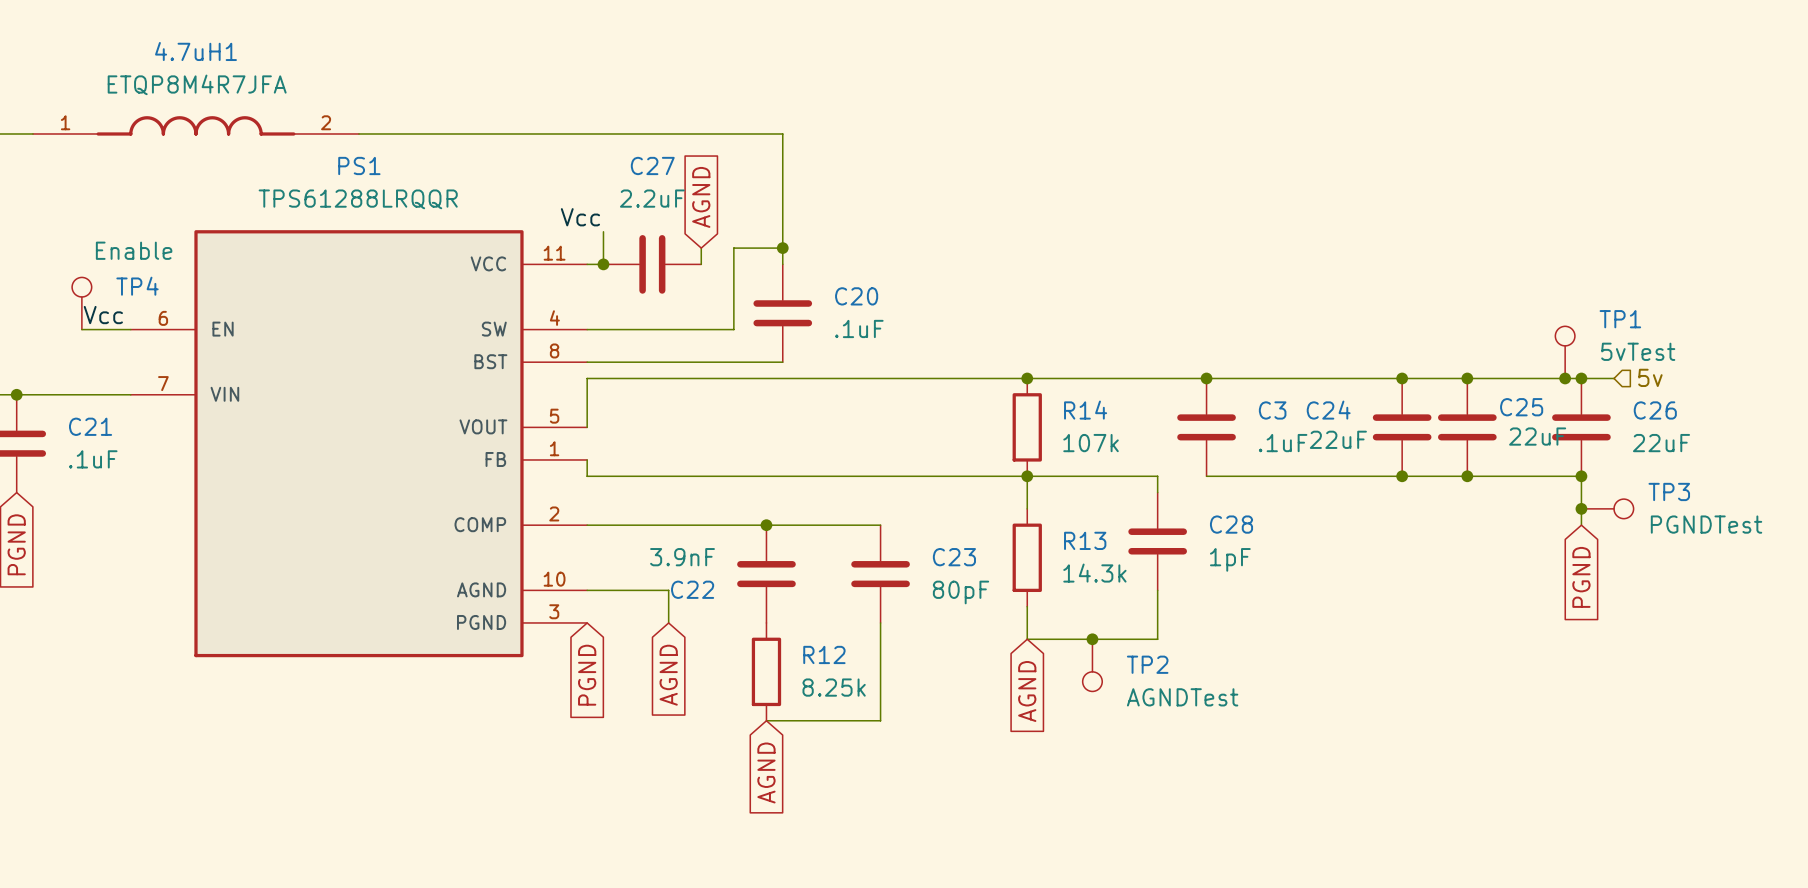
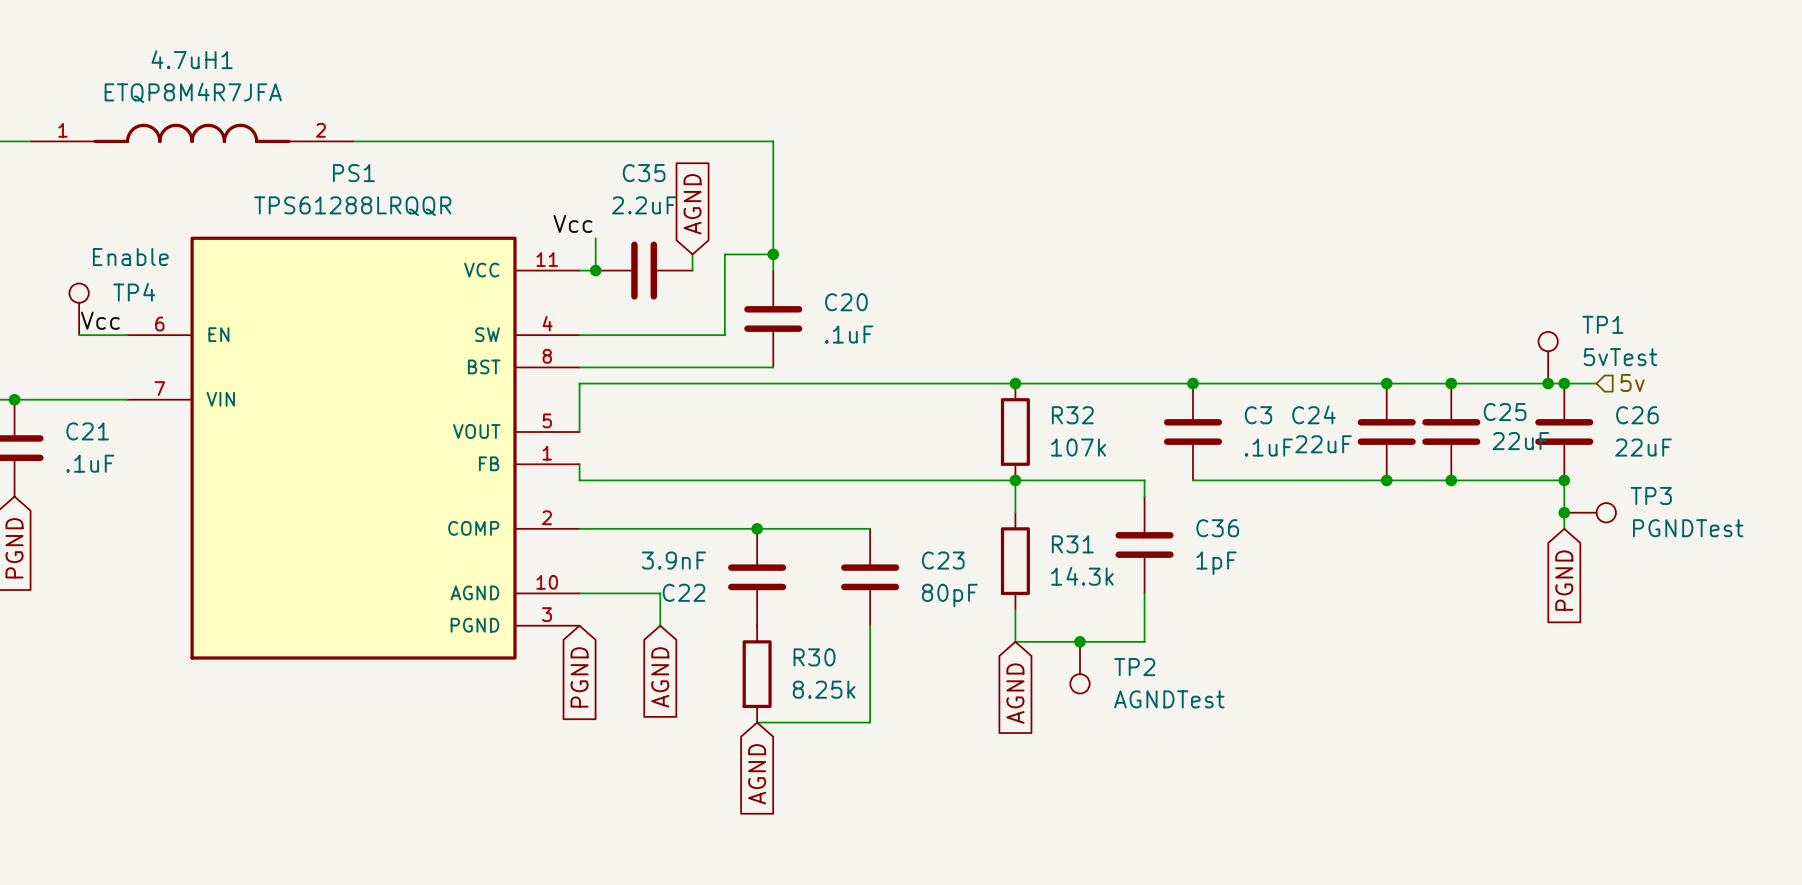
C27 name: C27 (652, 165) -> C35 (644, 173)
R14 name: R14 (1085, 410) -> R32 (1072, 415)
C28 name: C28 (1231, 524) -> C36 (1217, 528)
R13 name: R13 (1085, 540) -> R31 (1072, 544)
R12 name: R12 (824, 654) -> R30 (814, 657)

